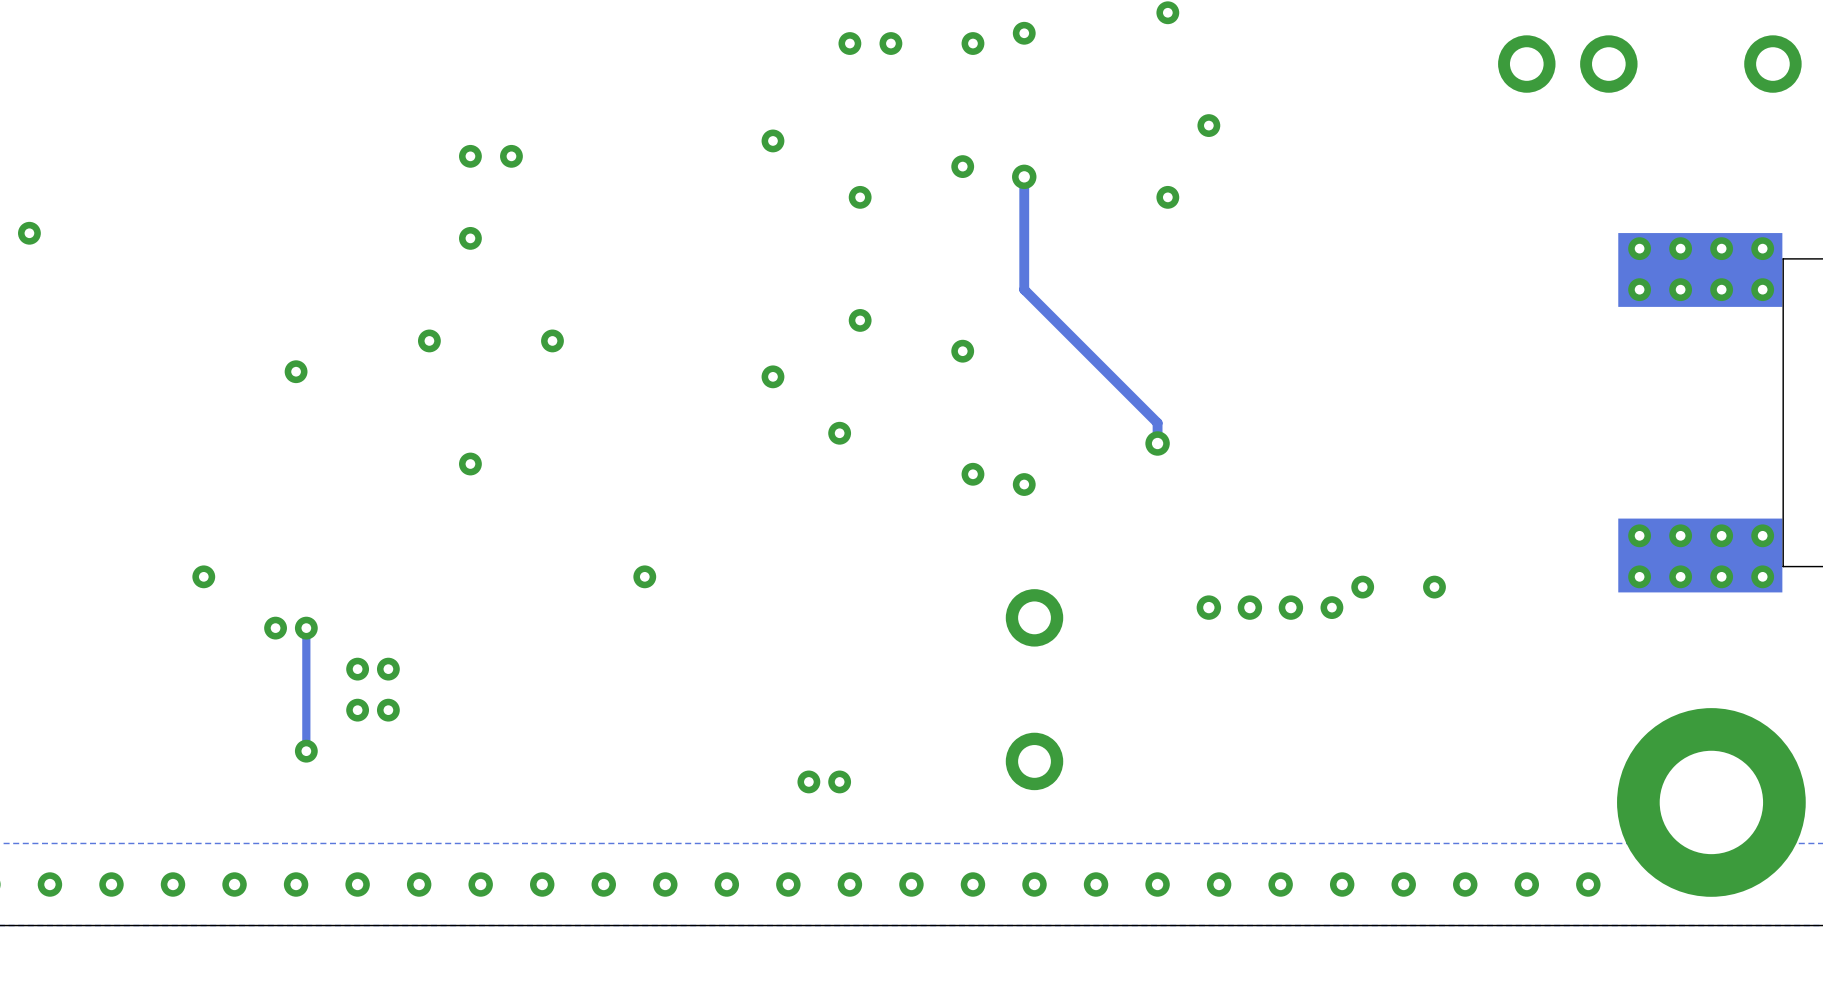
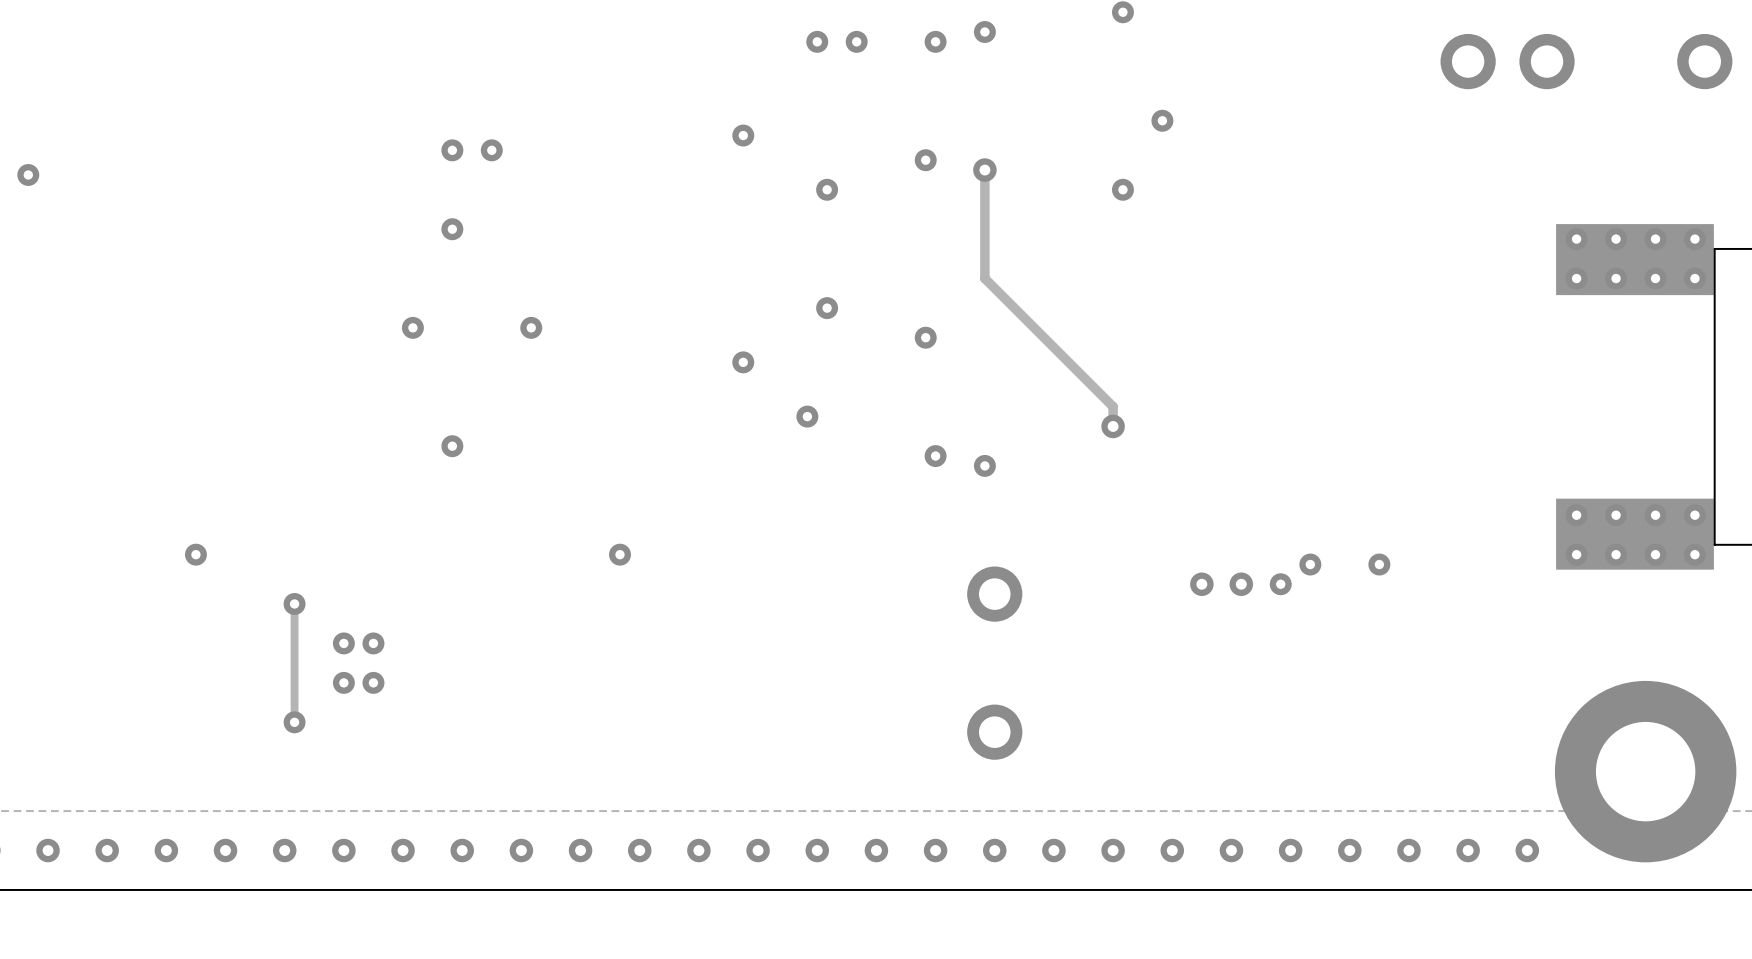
via position: (29, 233) -> (28, 174)
via: (296, 371) -> none
via: (1208, 607) -> none
via: (275, 628) -> none
via: (808, 781) -> none
via: (839, 781) -> none

